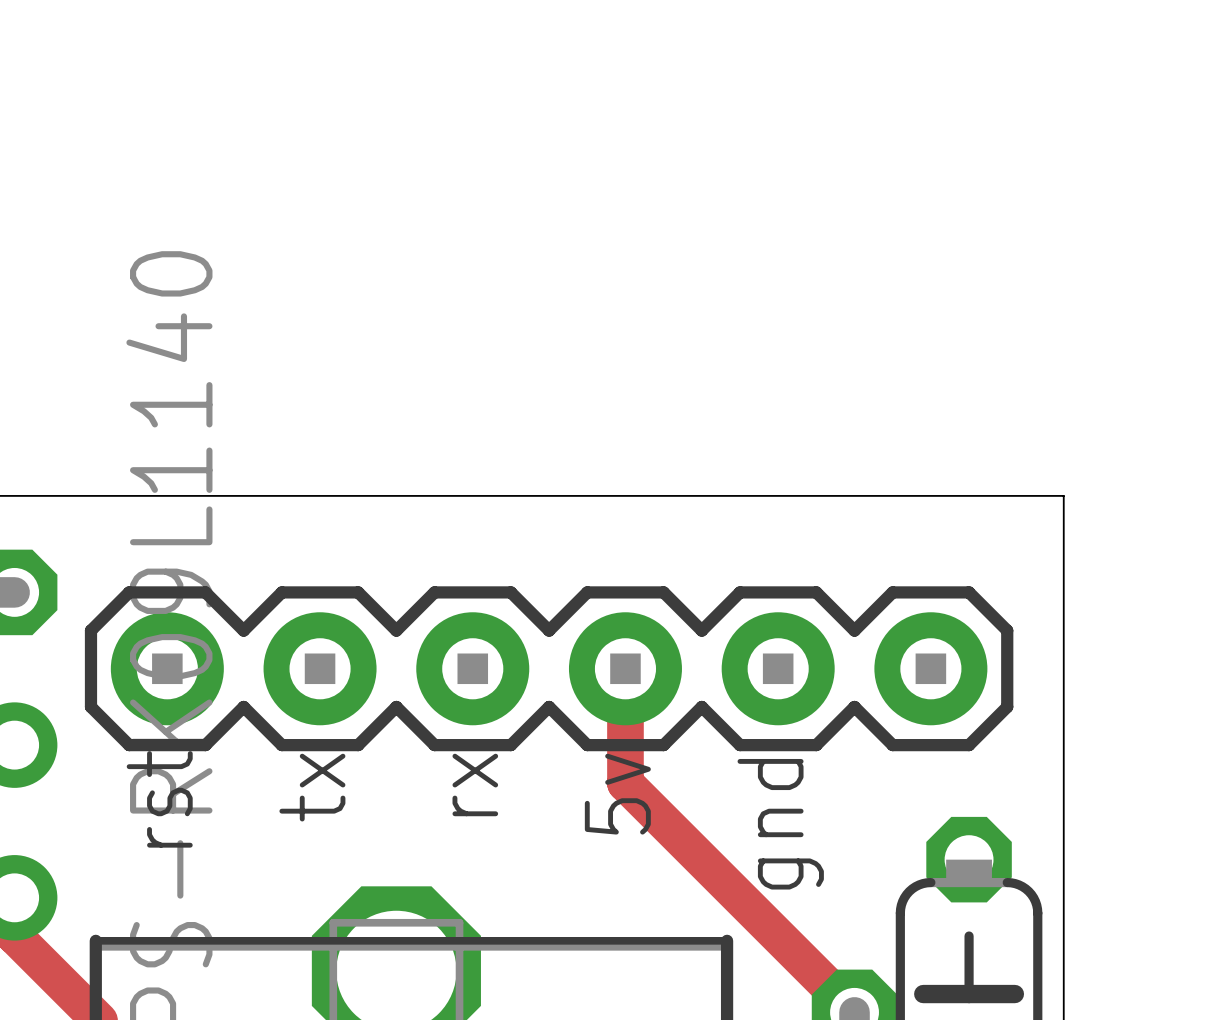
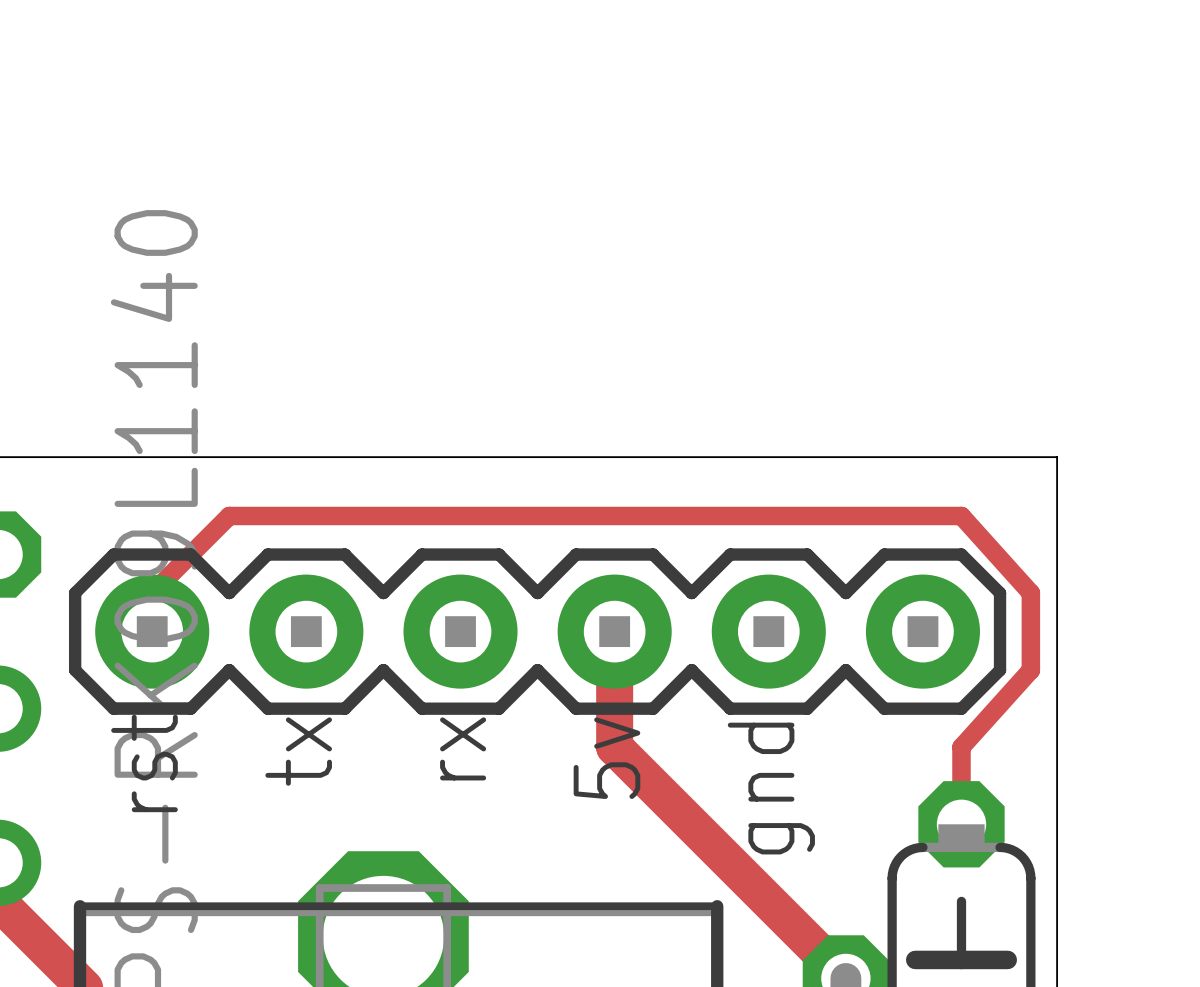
track: none -> (152, 631) (152, 593) (229, 516) (961, 516) (1030, 593) (1030, 670) (961, 747) (961, 824)

